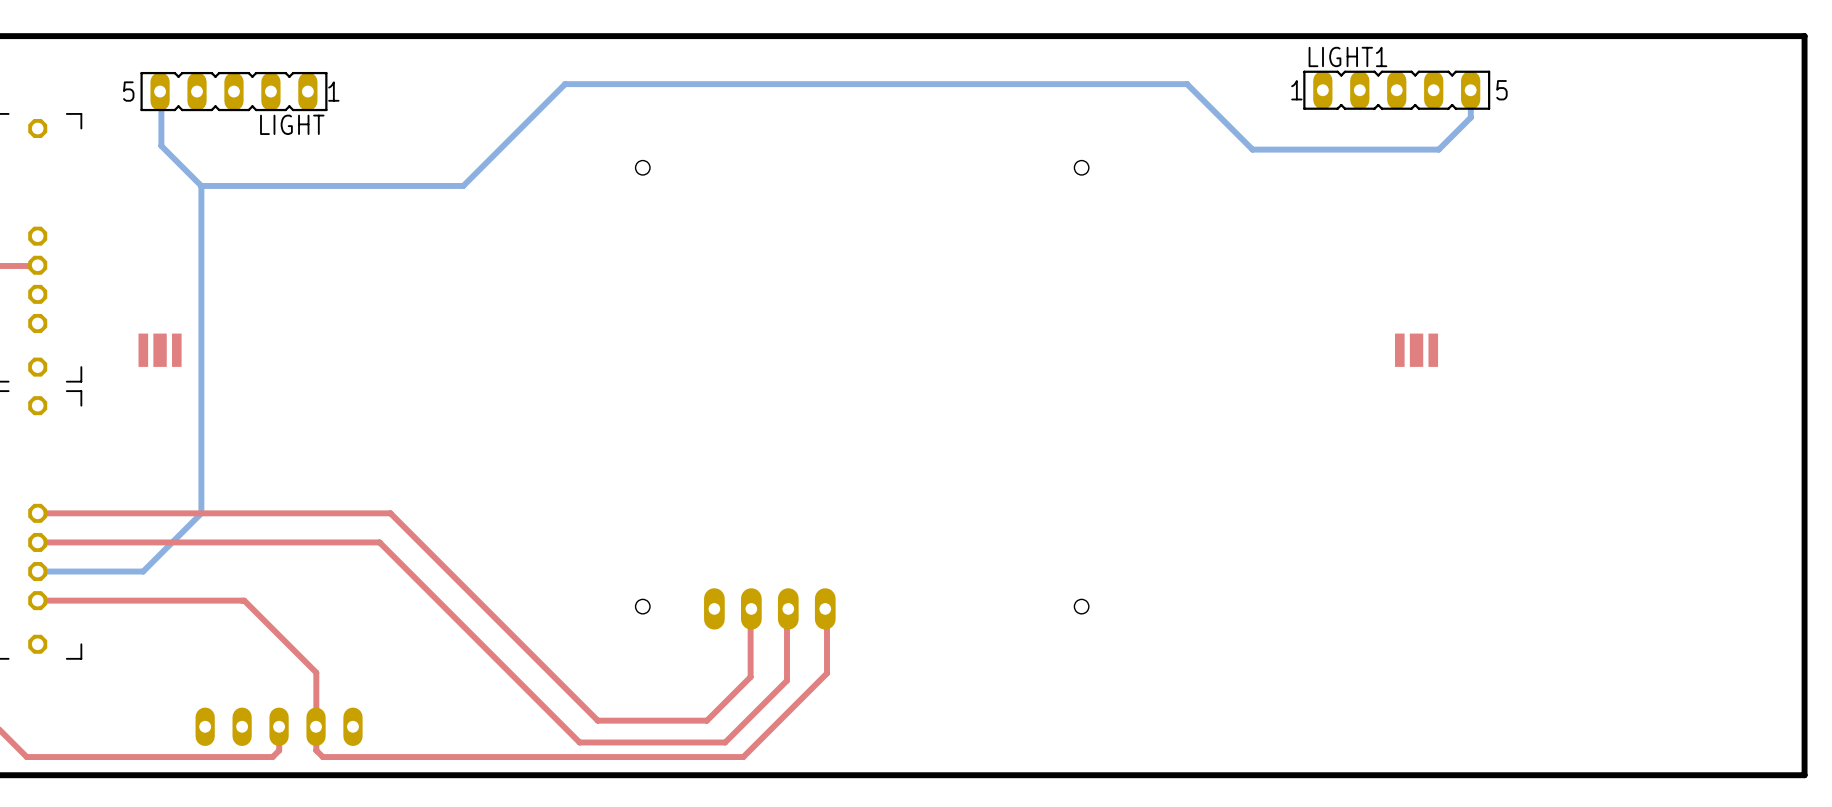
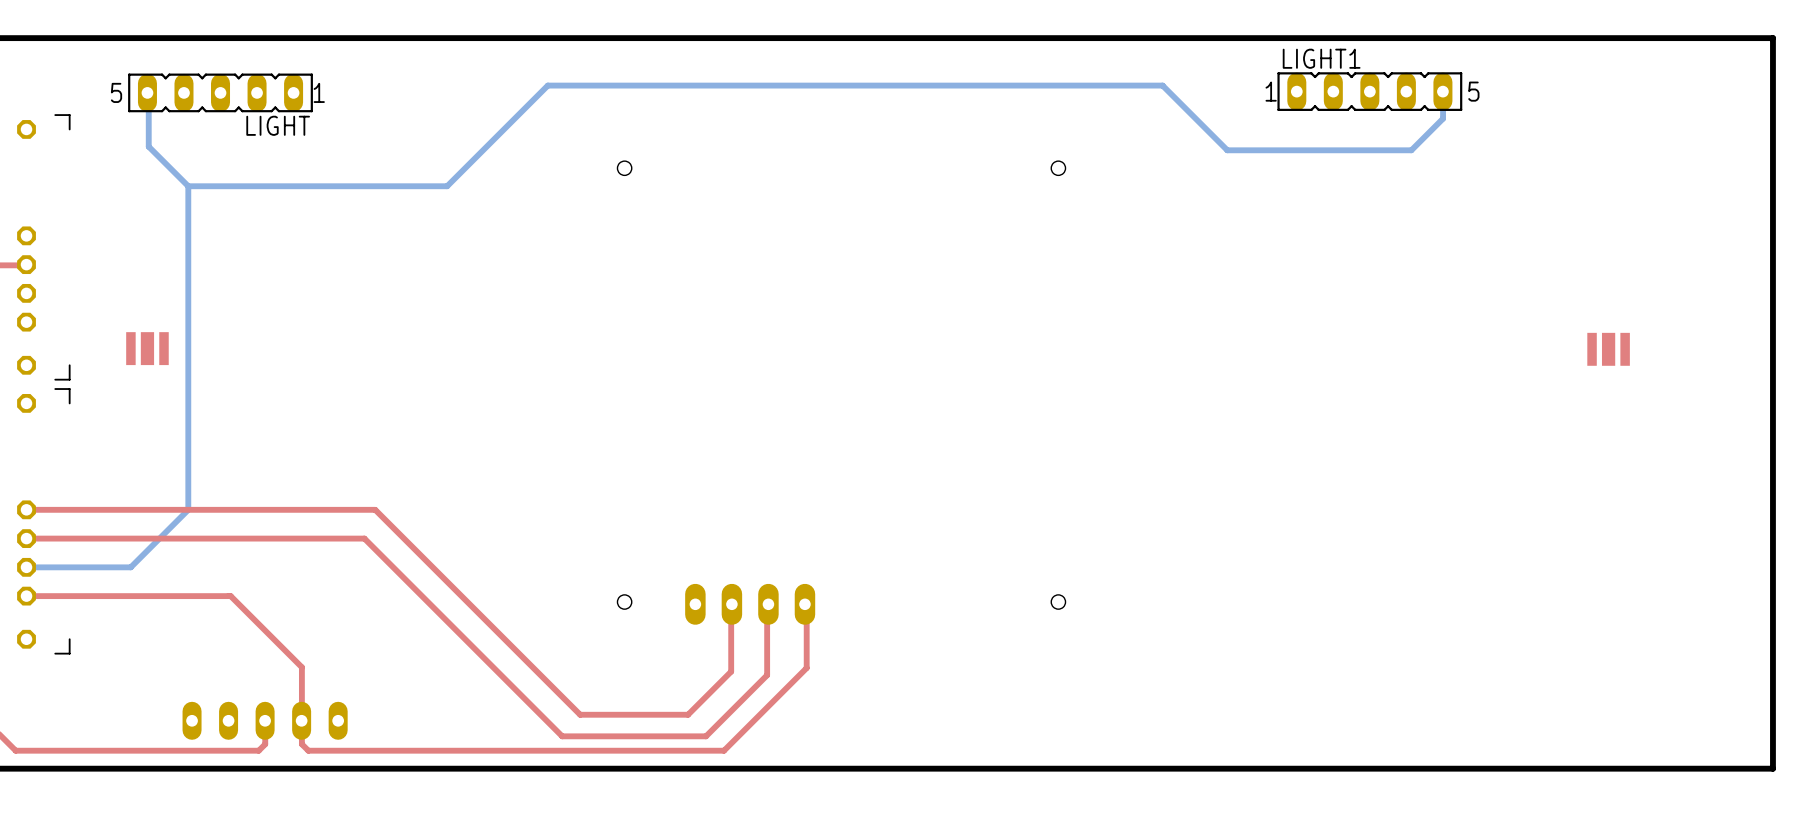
part position: (1416, 350) -> (1608, 349)

